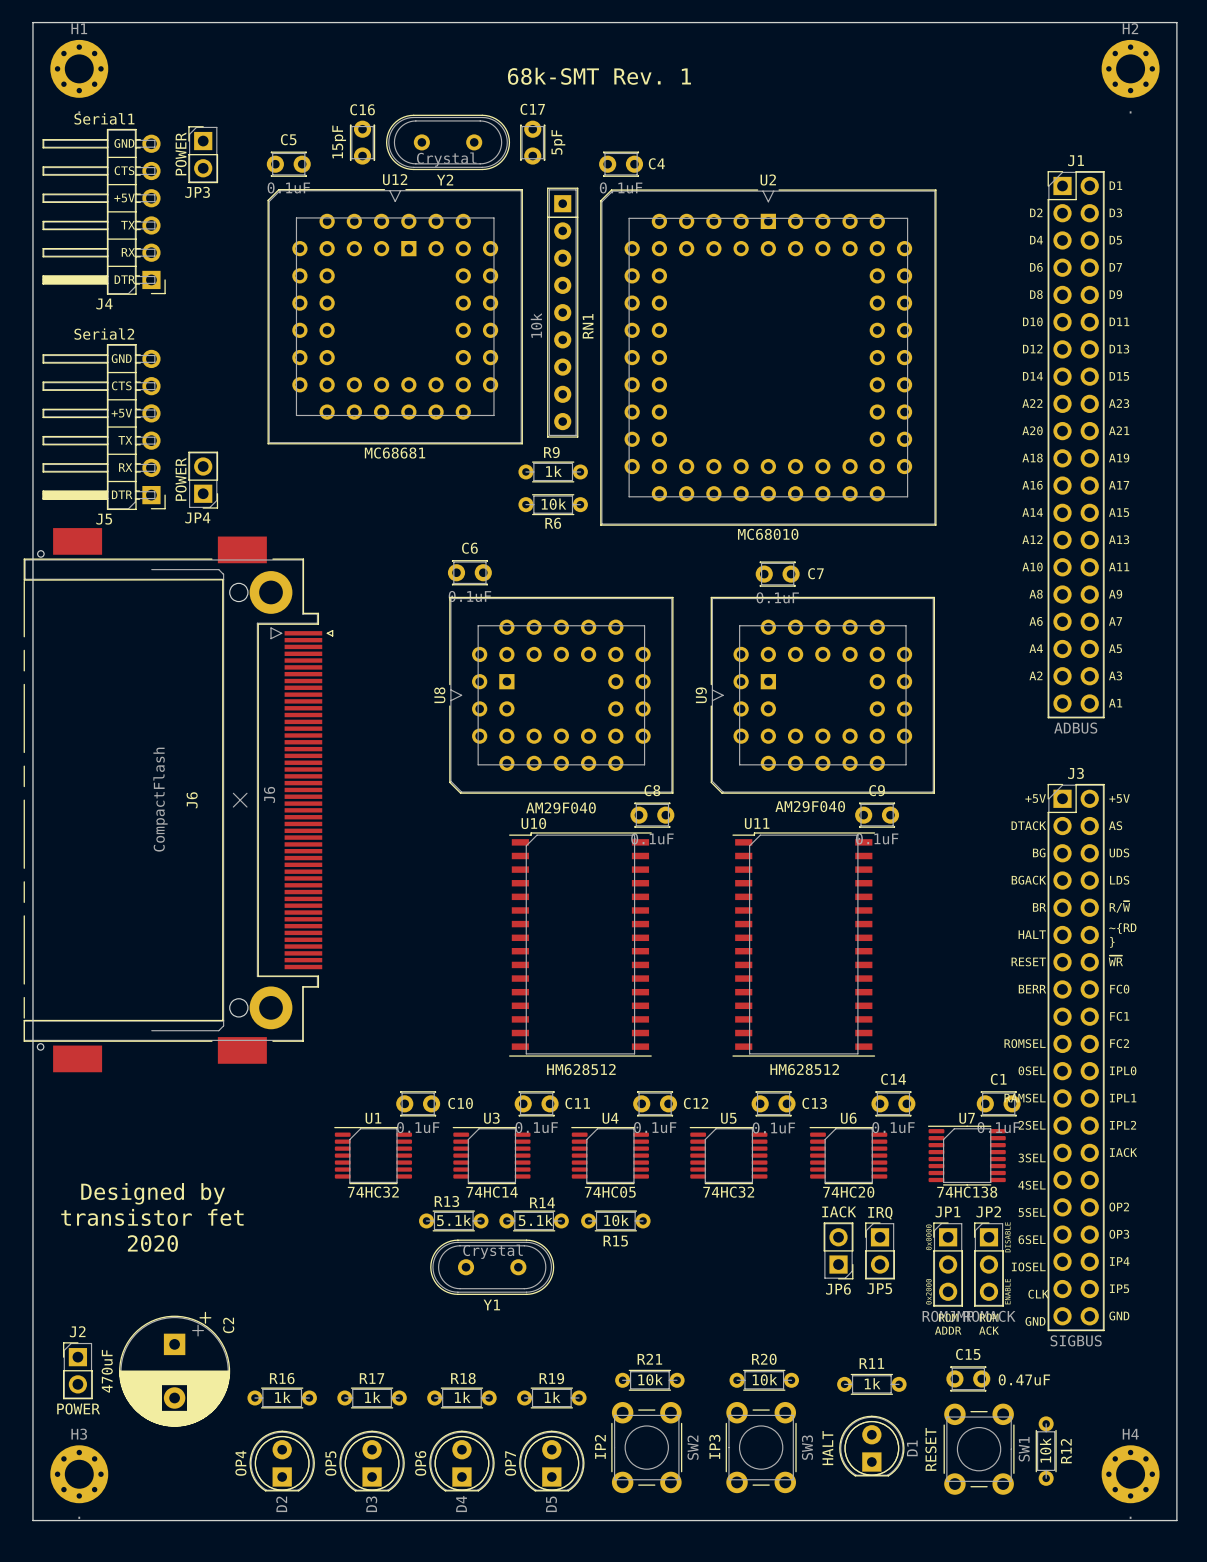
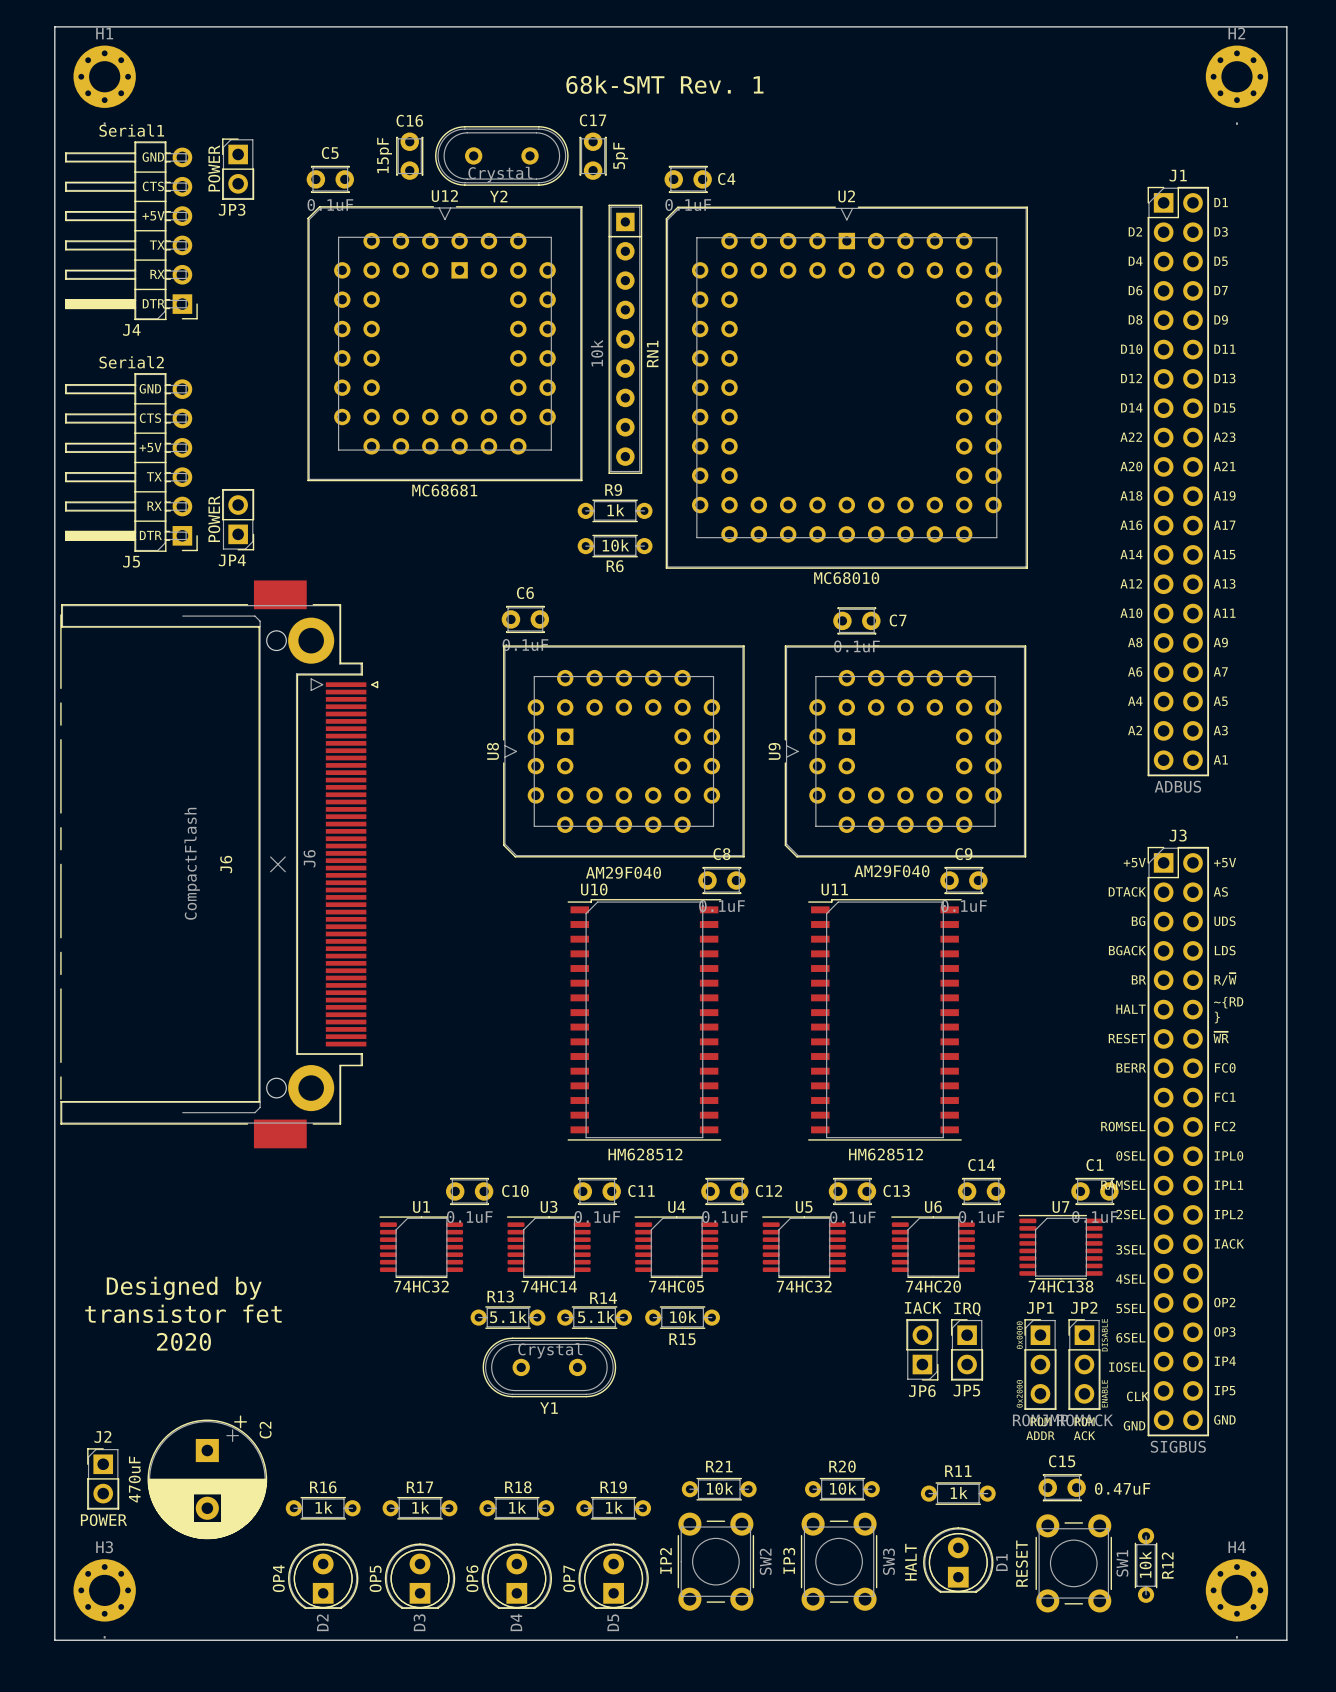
J6 footprint: [23, 528, 334, 1073] -> [60, 580, 379, 1149]

